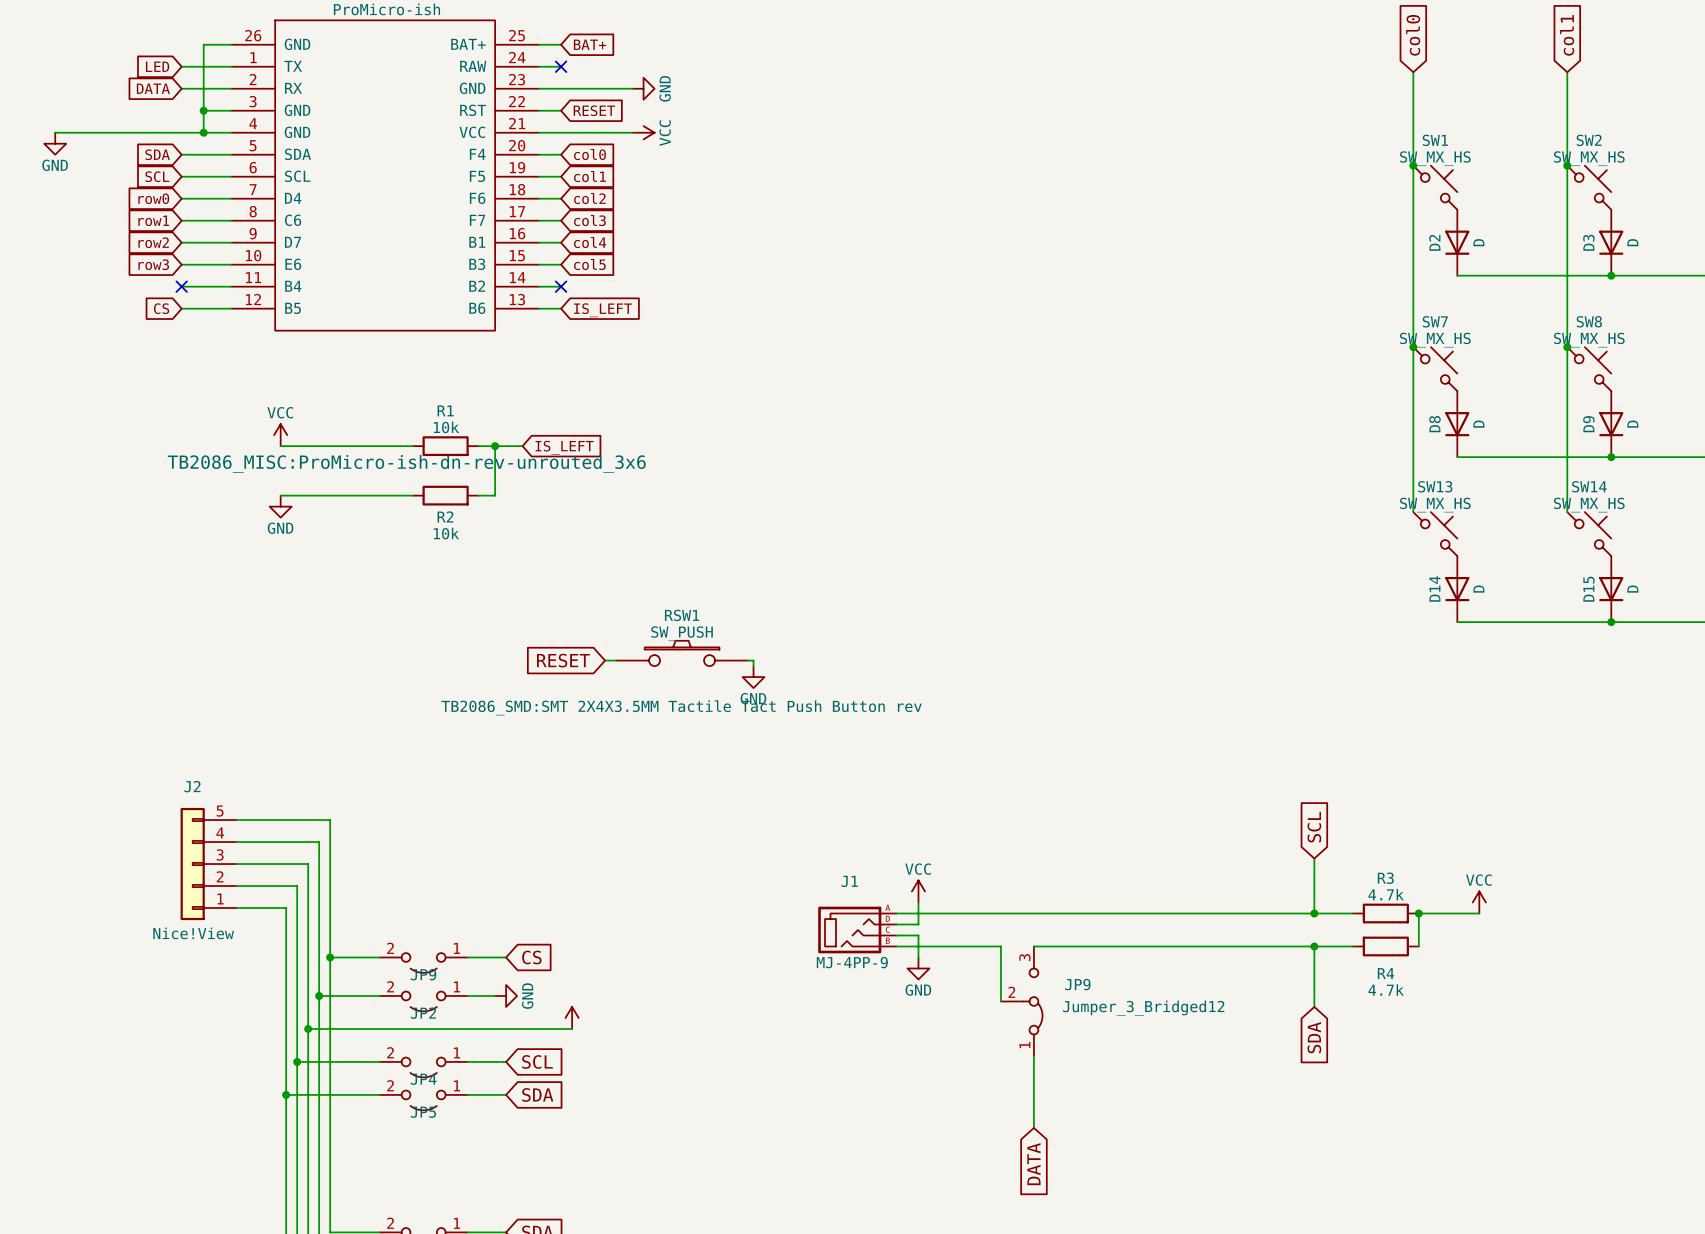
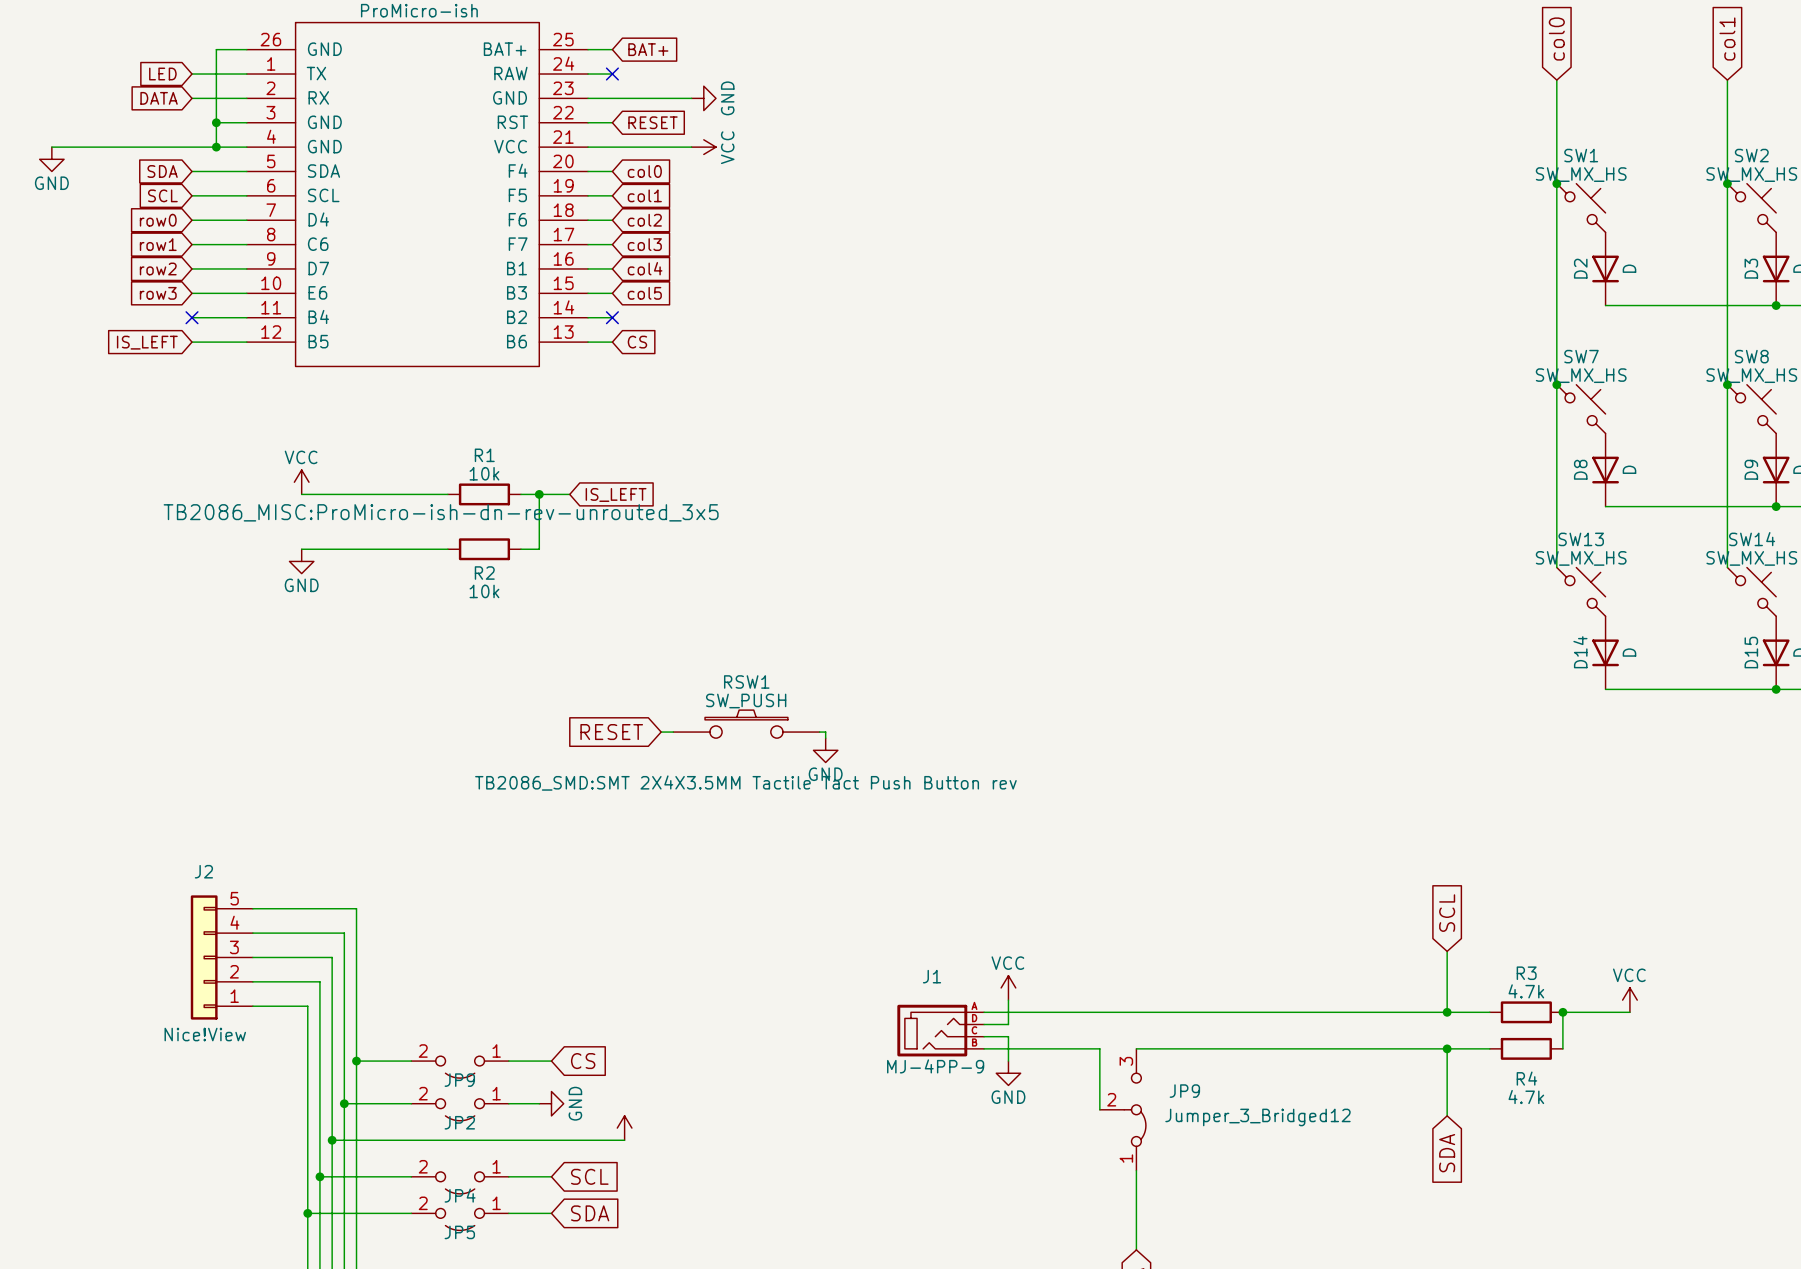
global label: CS (161, 308) -> IS_LEFT (147, 342)
global label: IS_LEFT (603, 310) -> CS (637, 342)
part text: TB2086_MISC:ProMicro-ish-dn-rev-unrouted_3x6 (406, 463) -> TB2086_MISC:ProMicro-ish-dn-rev-unrouted_3x5 (441, 512)

